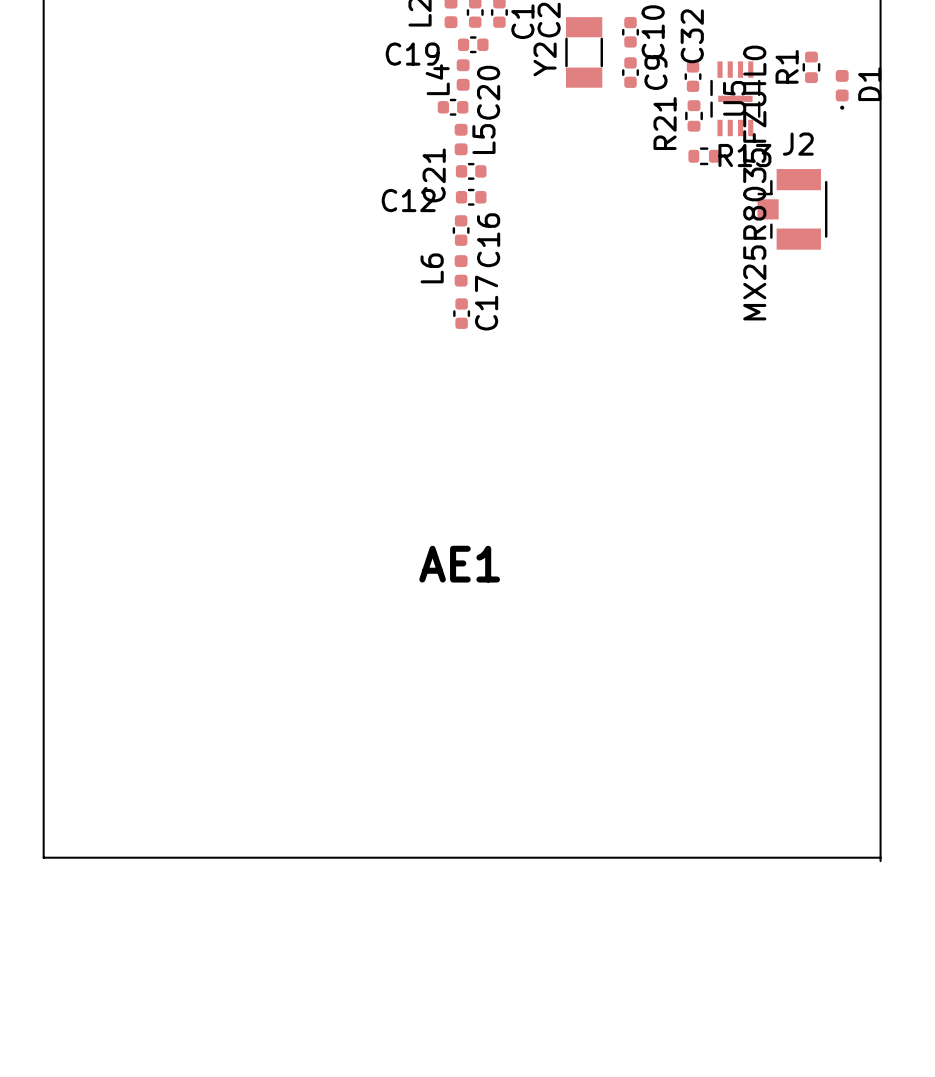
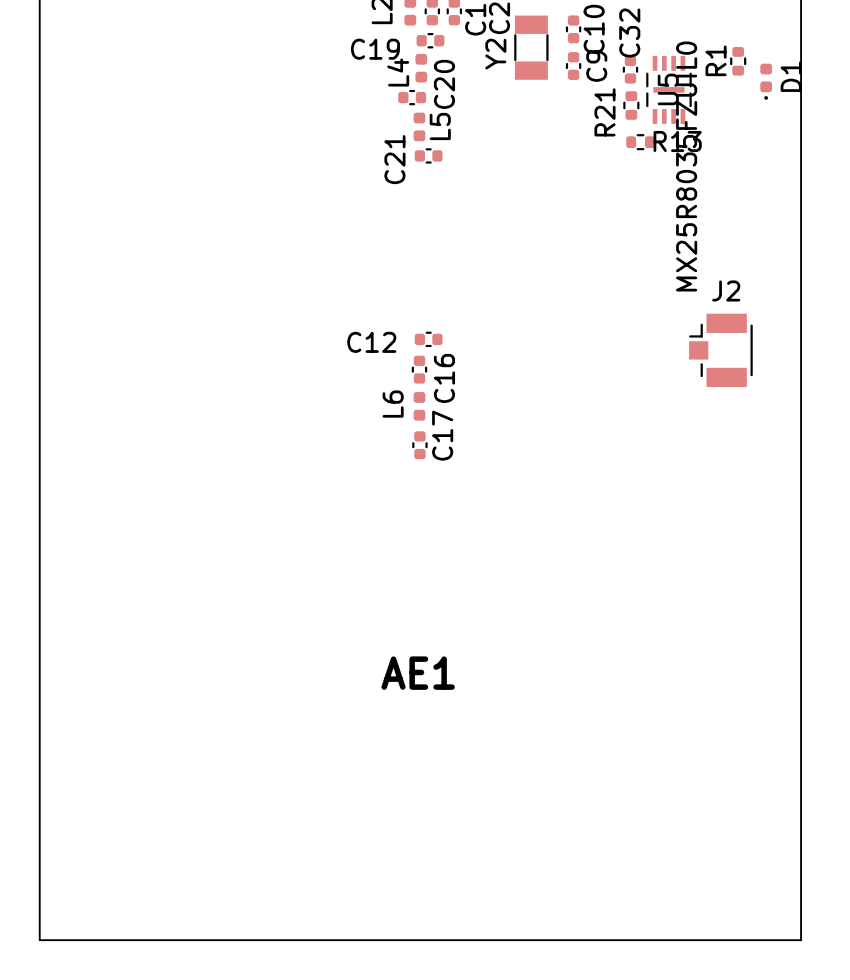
C12 position: (471, 197) -> (428, 339)
J2 position: (792, 209) -> (720, 350)
C16 position: (461, 230) -> (419, 369)
L6 position: (461, 270) -> (419, 406)
C17 position: (461, 313) -> (419, 445)
AE1 position: (459, 564) -> (418, 673)
board edge: (43, 857) (880, 857) -> (39, 780) (39, 940) (801, 940) (801, 783)

